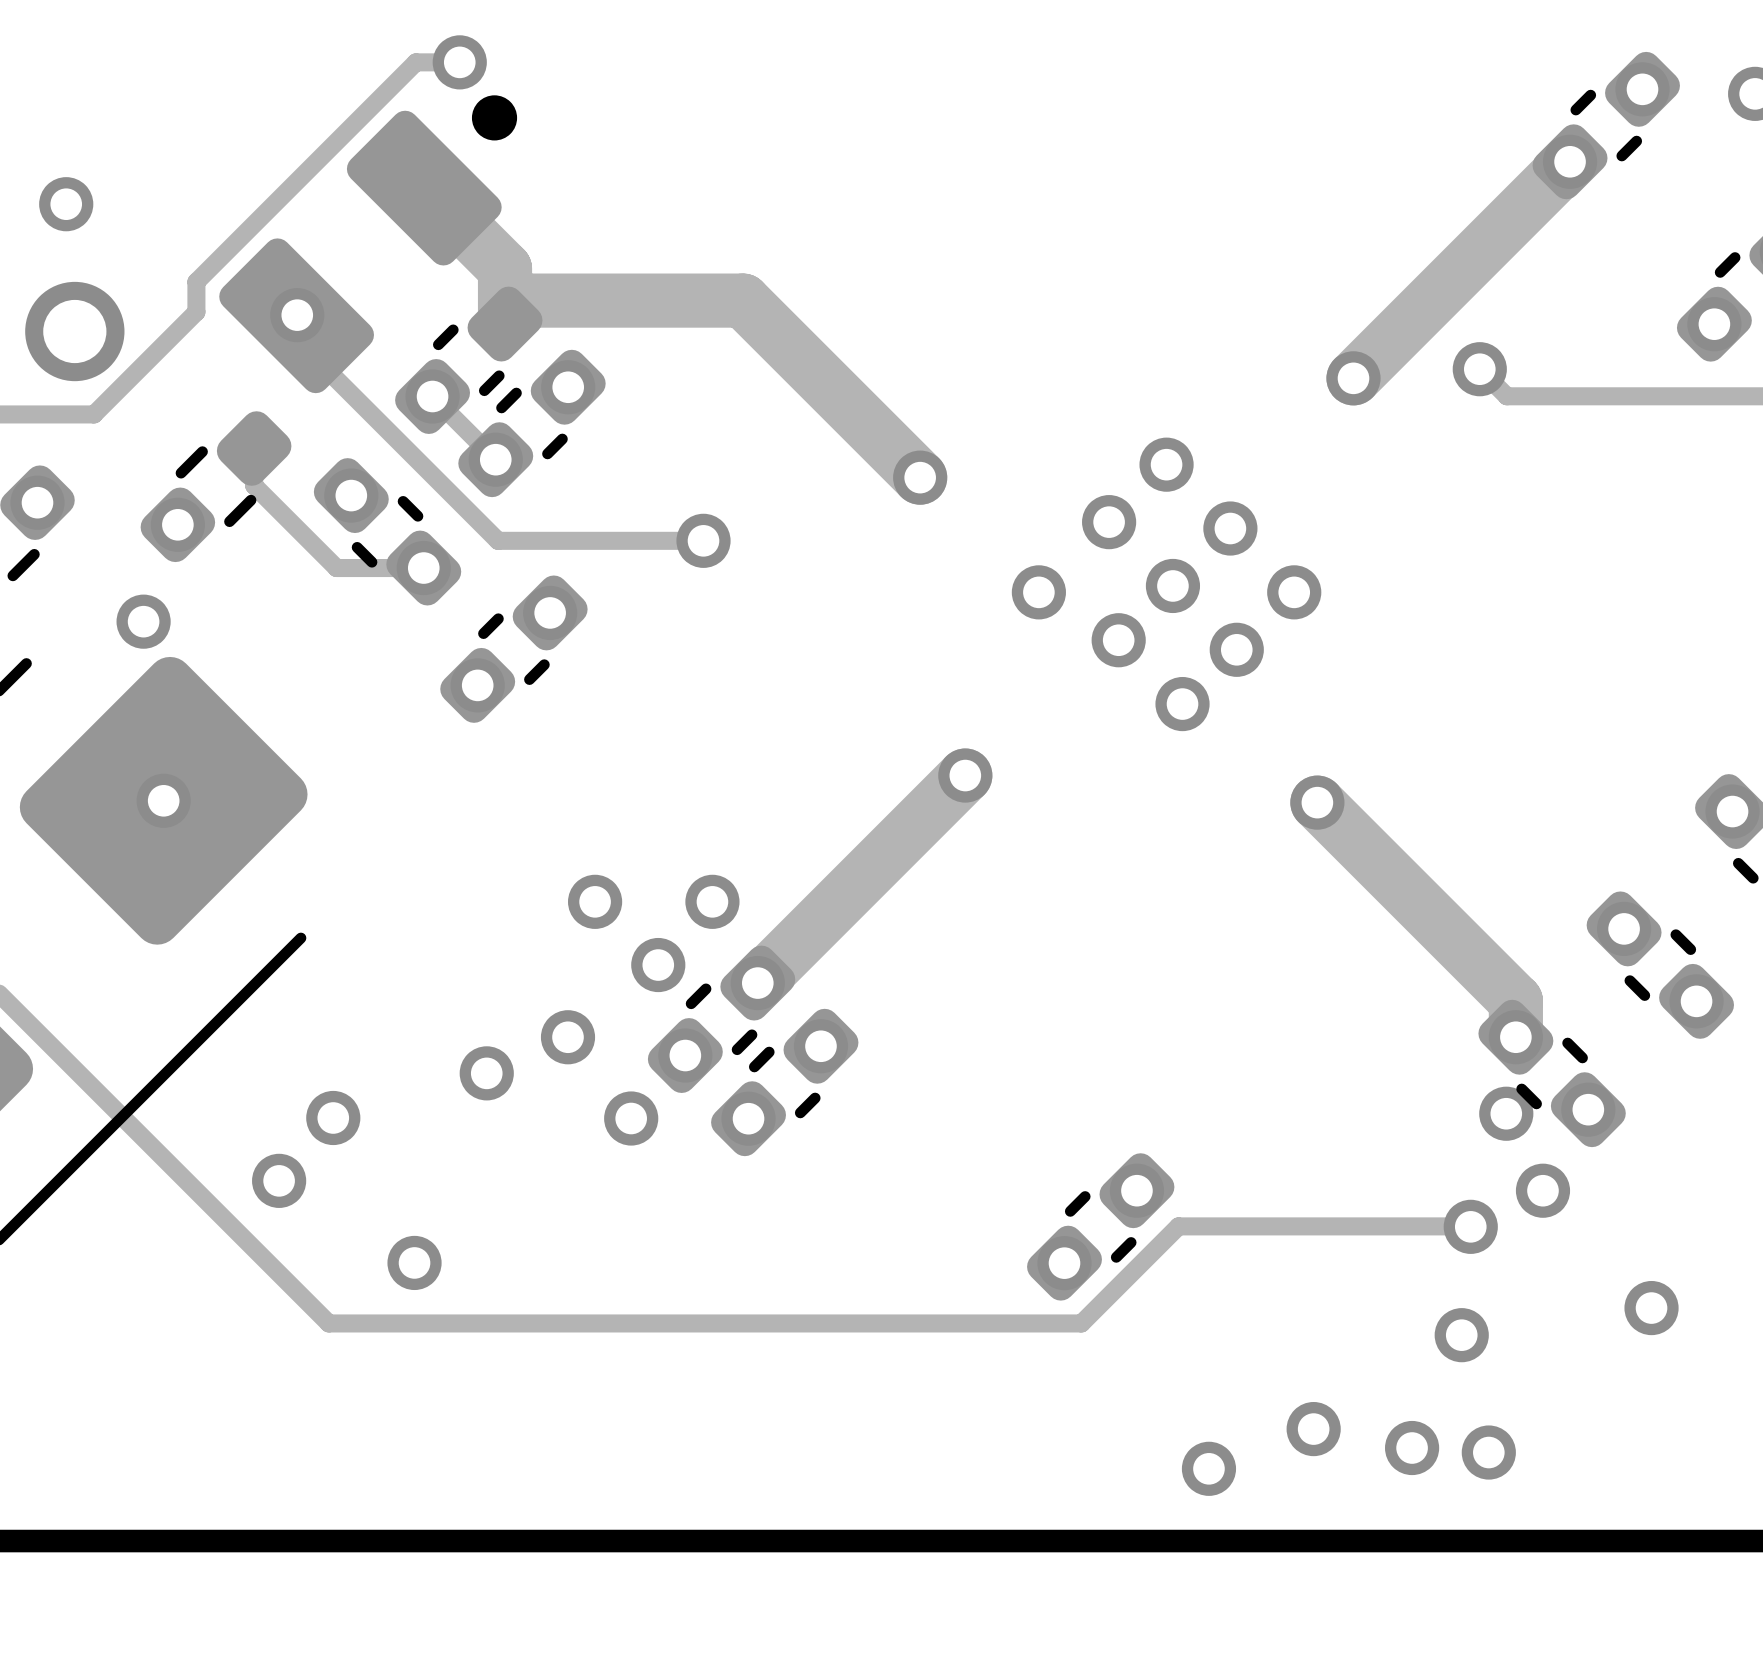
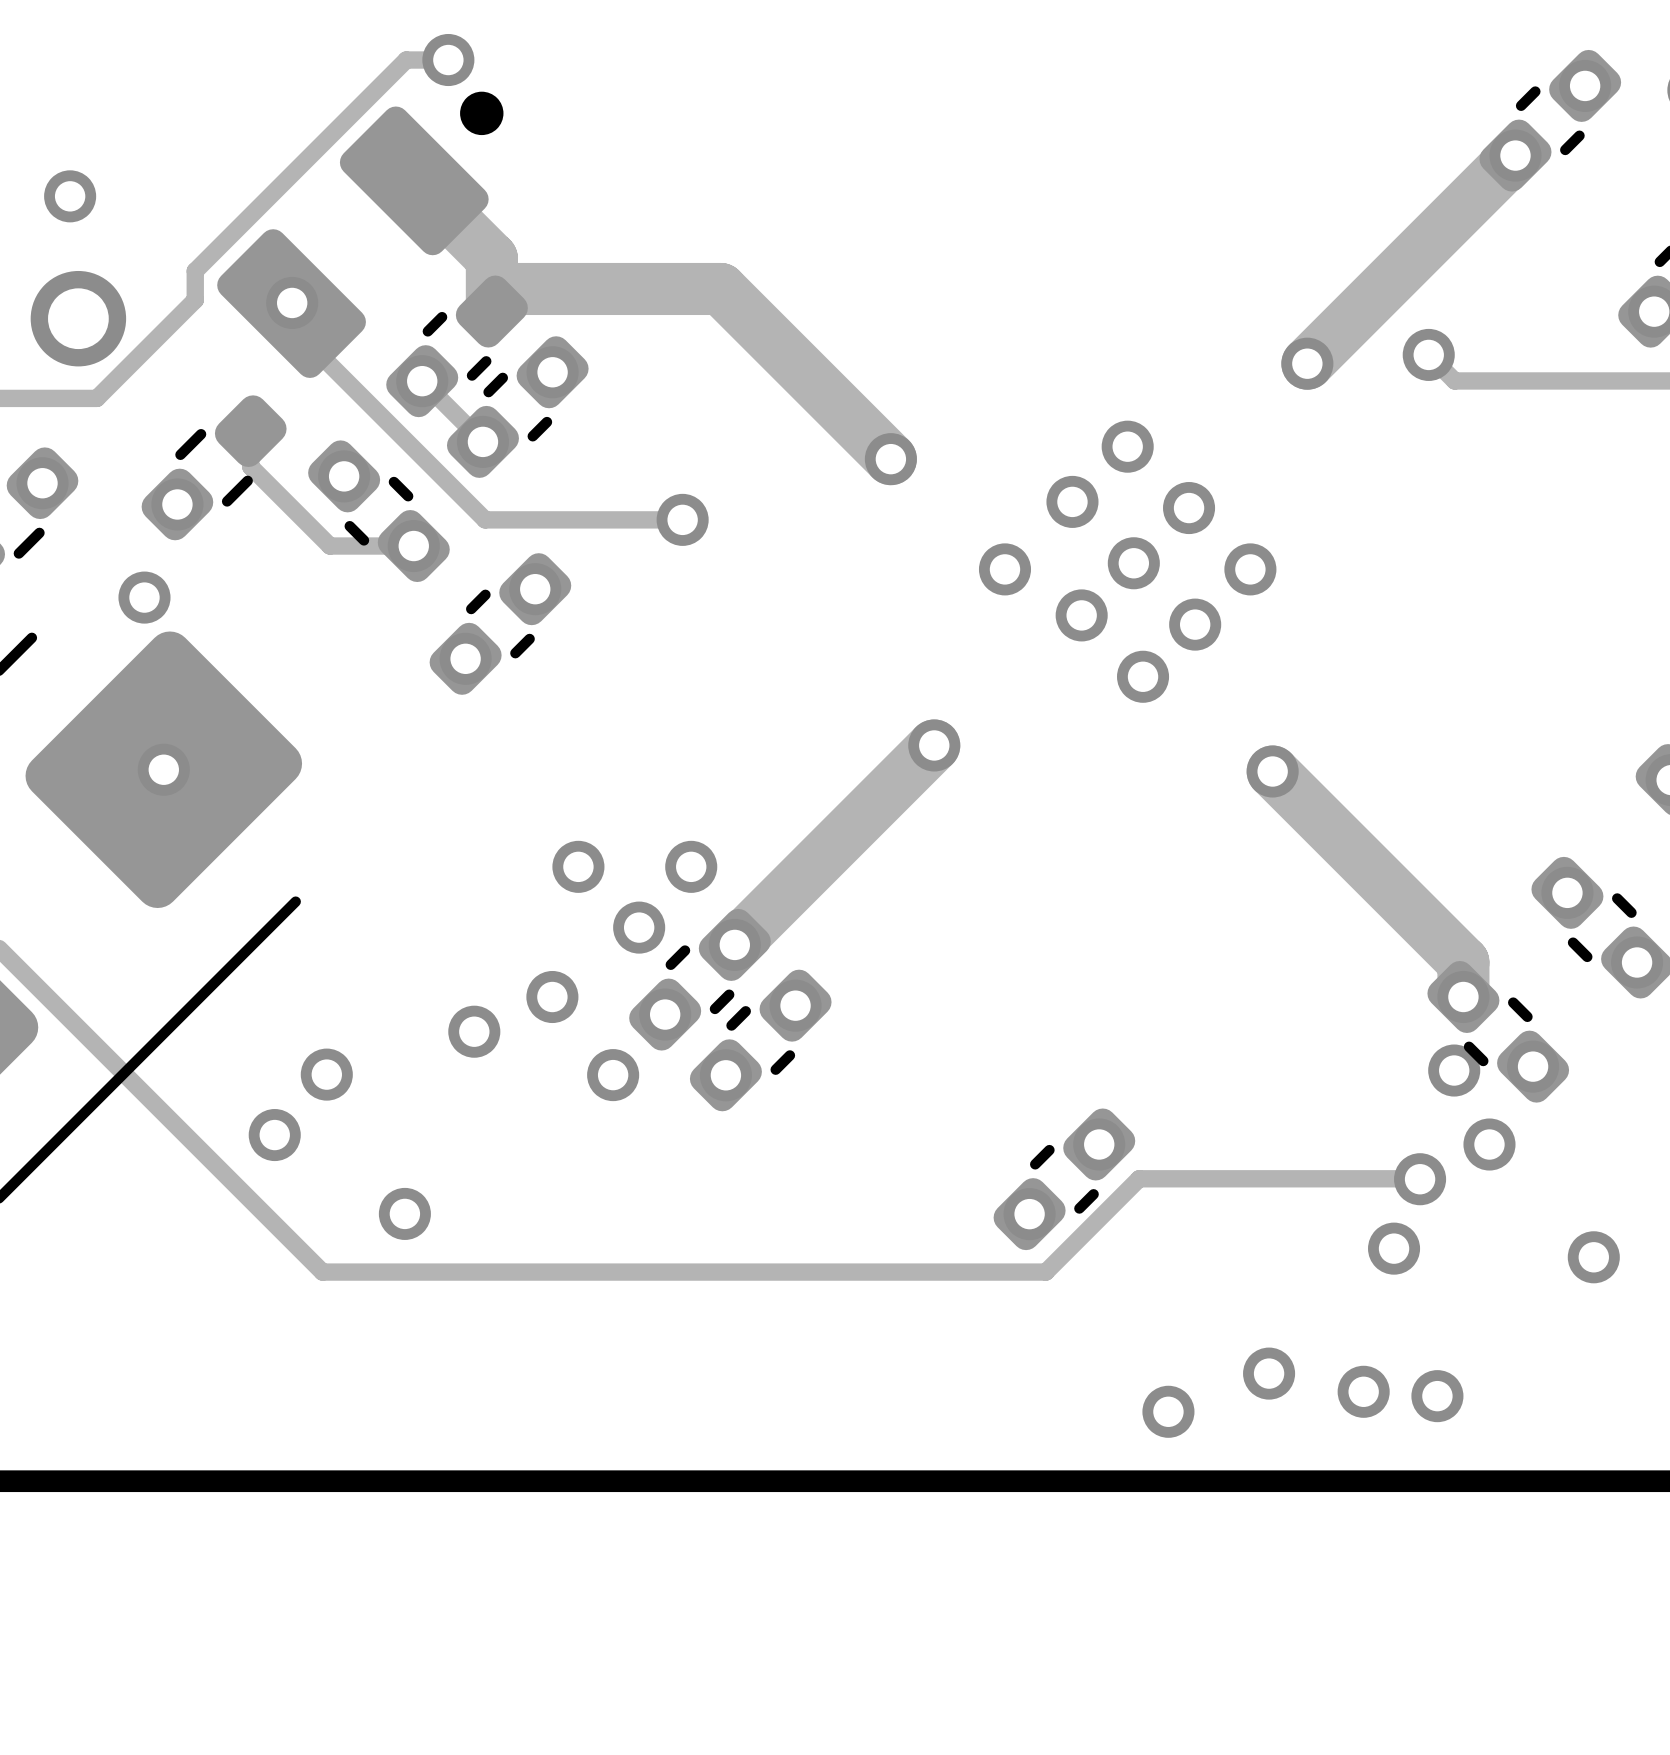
via position: (1461, 1335) -> (1394, 1248)

